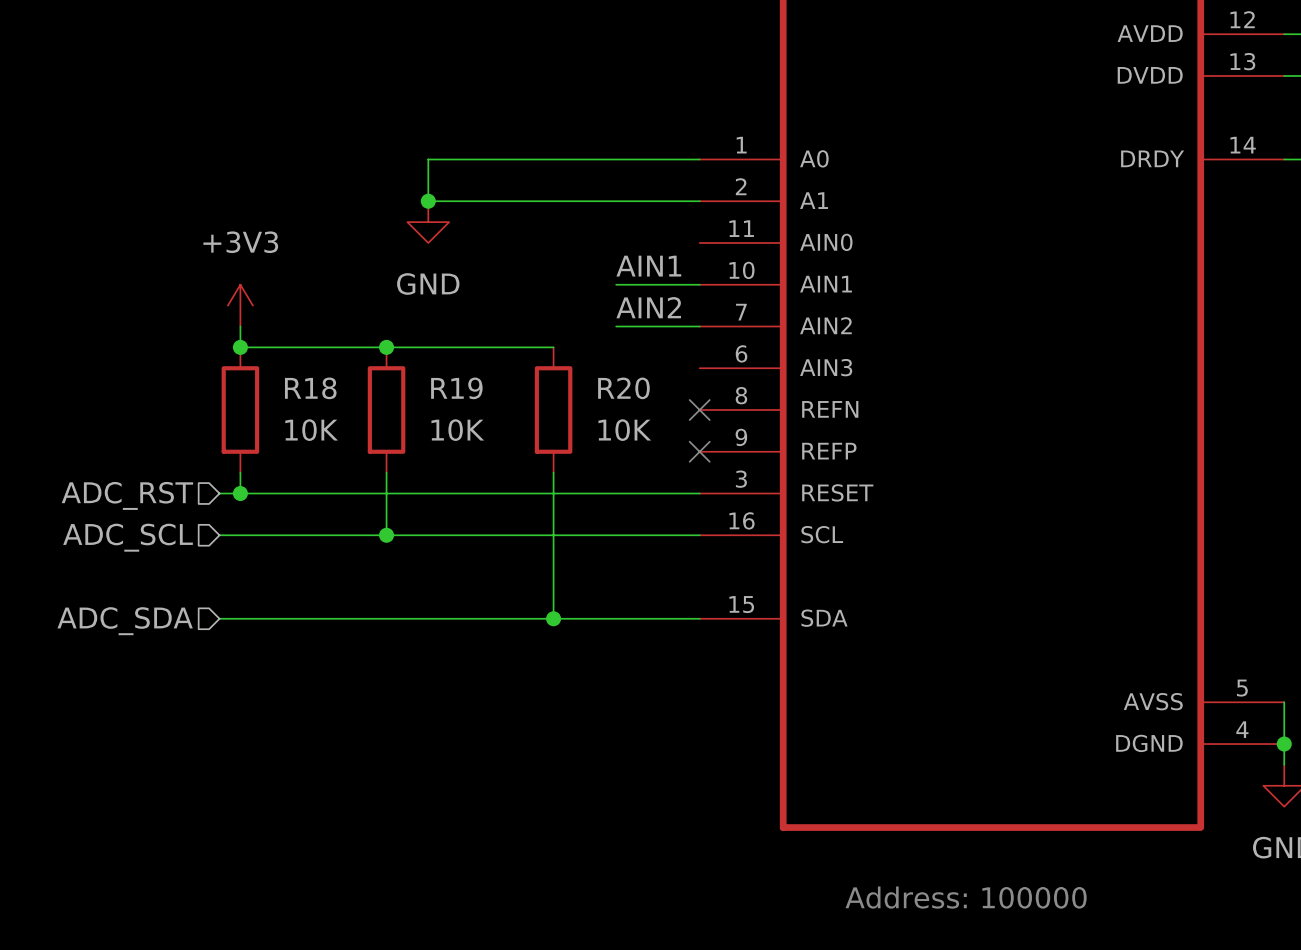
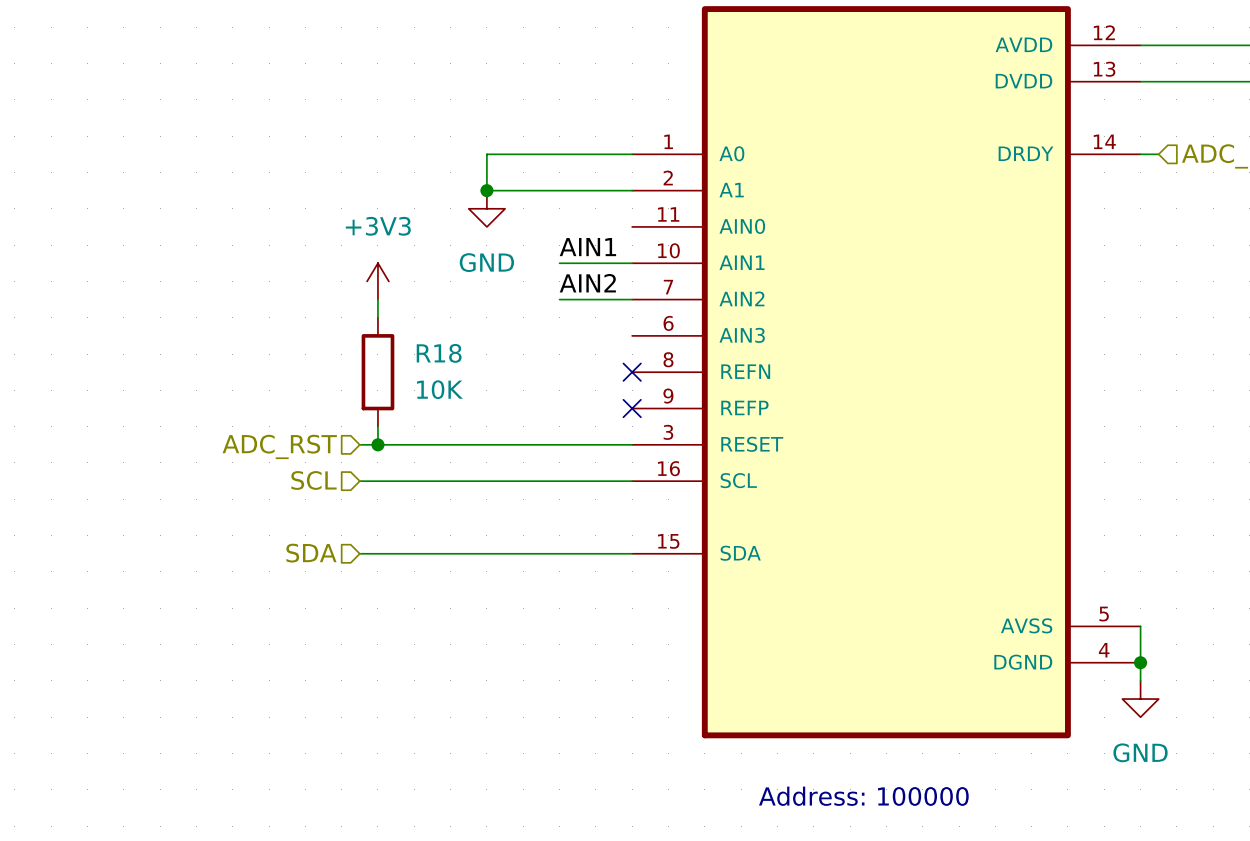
wire: (532, 159) (428, 159) (428, 201) (532, 201) -> (486, 154) (486, 190)
junction: (428, 201) -> none
junction: none -> (486, 190)
power symbol position: GND (428, 222) -> GND (486, 208)
power symbol position: +3V3 (240, 305) -> +3V3 (377, 281)
wire: (240, 326) (240, 347) (553, 347) -> none
wire: none -> (377, 299) (377, 317)
junction: (240, 347) -> none
junction: (386, 347) -> none
R18 position: (240, 410) -> (377, 372)
R19: 10K (386, 410) -> none
R20: 10K (553, 410) -> none
wire: (240, 472) (240, 493) -> (377, 426) (377, 444)
wire: (386, 472) (386, 535) (219, 535) -> none
wire: (553, 472) (553, 618) -> none
wire: (219, 493) (386, 493) -> none
junction: (240, 493) -> none
hierarchical label position: ADC_RST (127, 495) -> ADC_RST (279, 446)
hierarchical label: none -> SCL (313, 480)
junction position: (386, 535) -> (377, 444)
hierarchical label: ADC_SCL (128, 537) -> none
wire: (219, 618) (386, 618) -> none
hierarchical label: none -> SDA (311, 553)
junction: (553, 618) -> none
hierarchical label: ADC_SDA (125, 621) -> none

